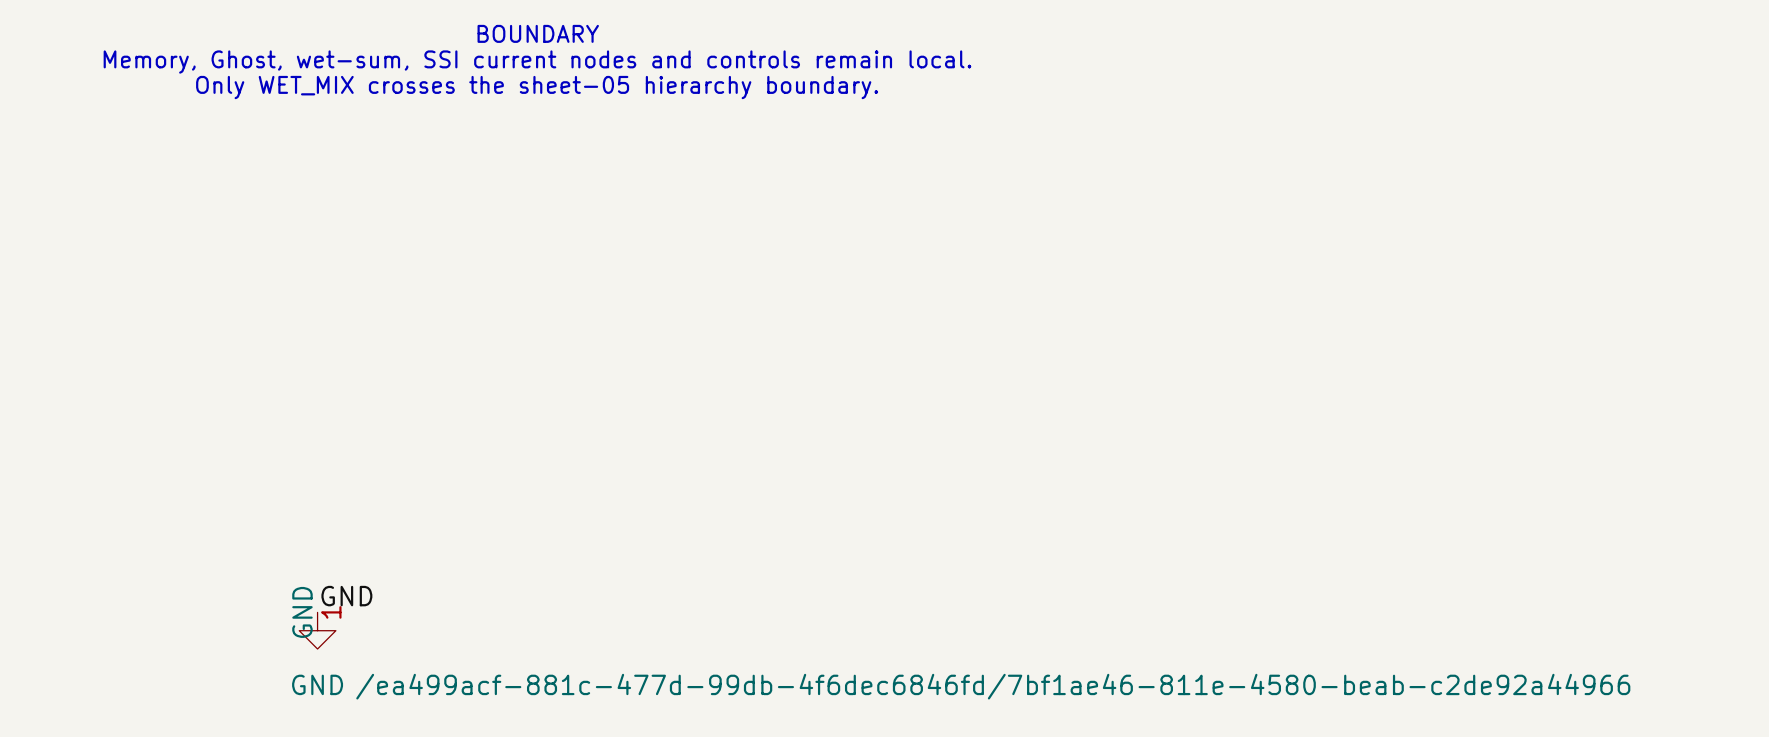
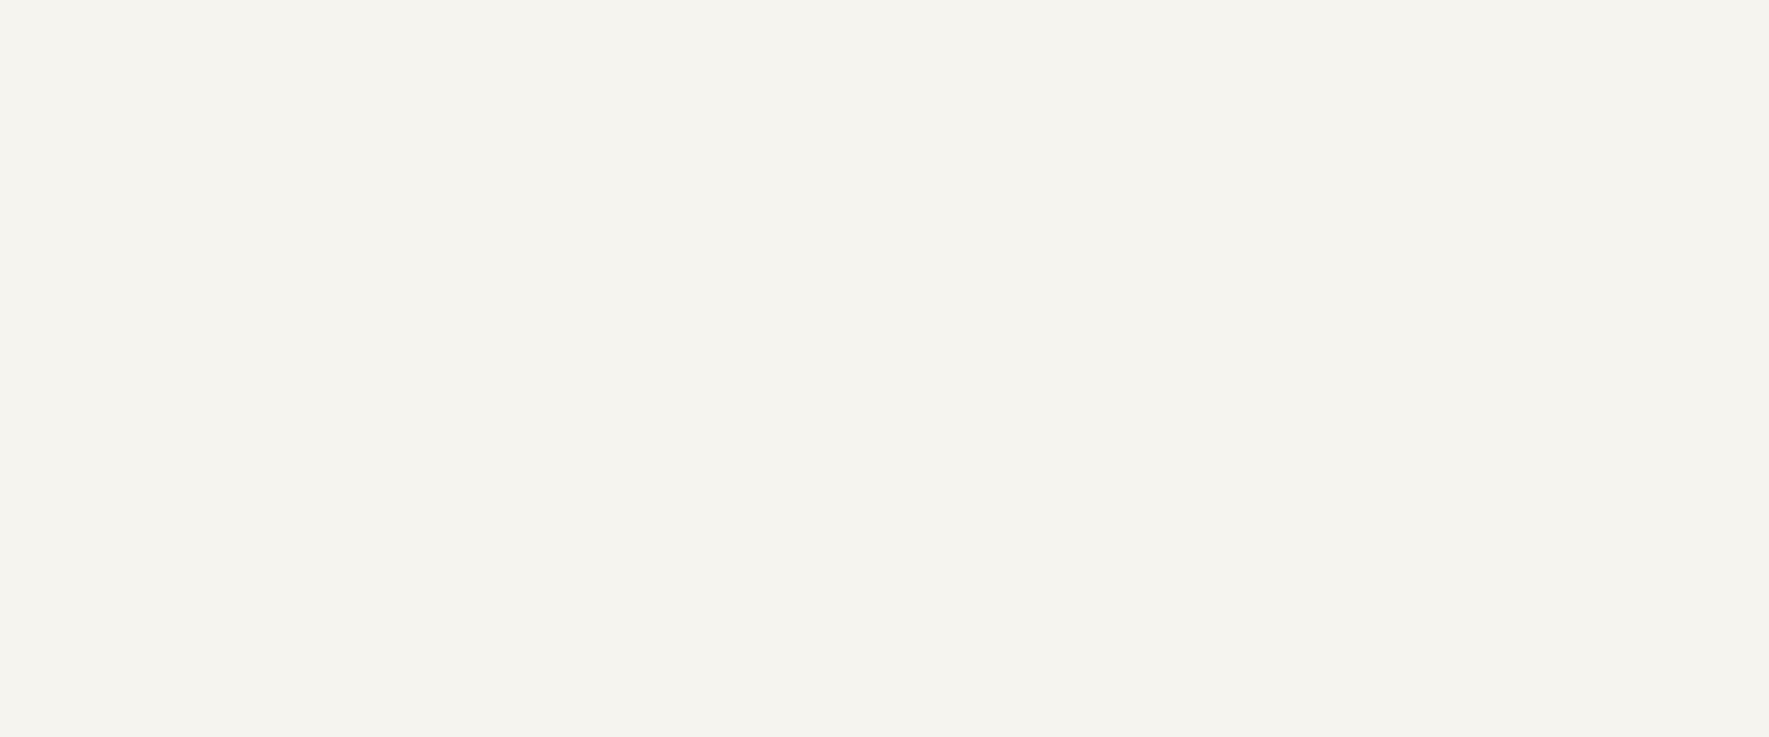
text: BOUNDARY (538, 33) -> none
text: Memory, Ghost, wet-sum, SSI current nodes and controls remain local. (537, 62) -> none
text: Only WET_MIX crosses the sheet-05 hierarchy boundary. (537, 87) -> none
label: GND (346, 596) -> none
power symbol: GND (317, 630) -> none

